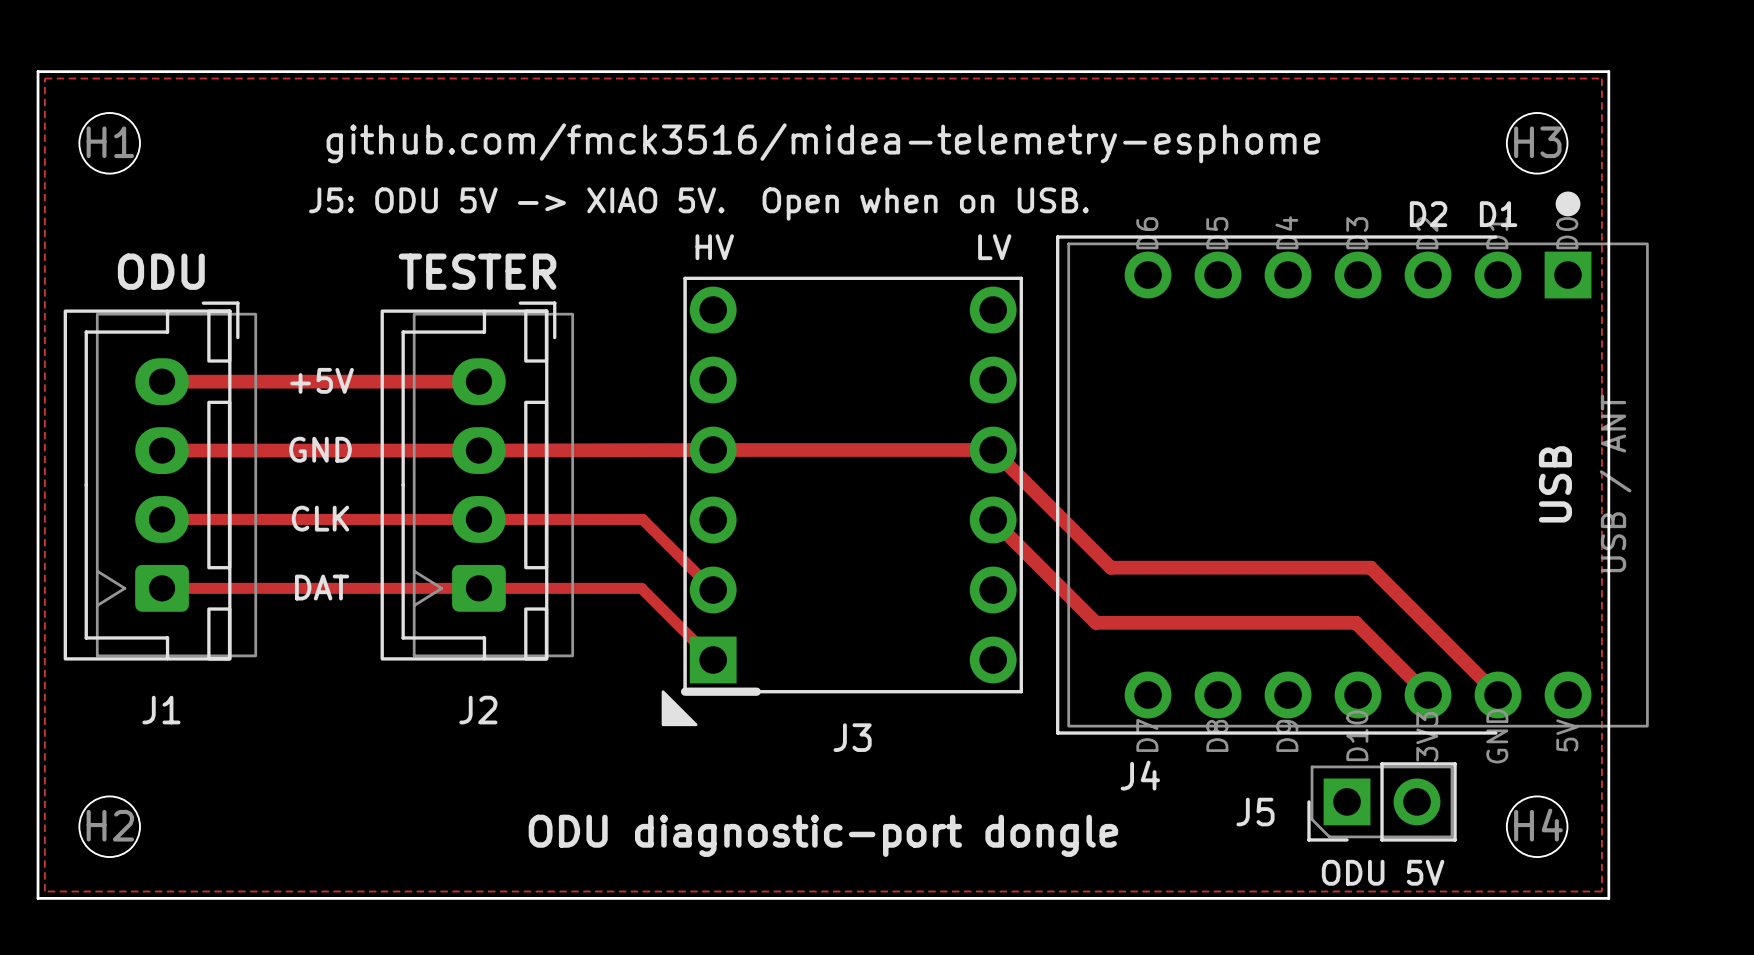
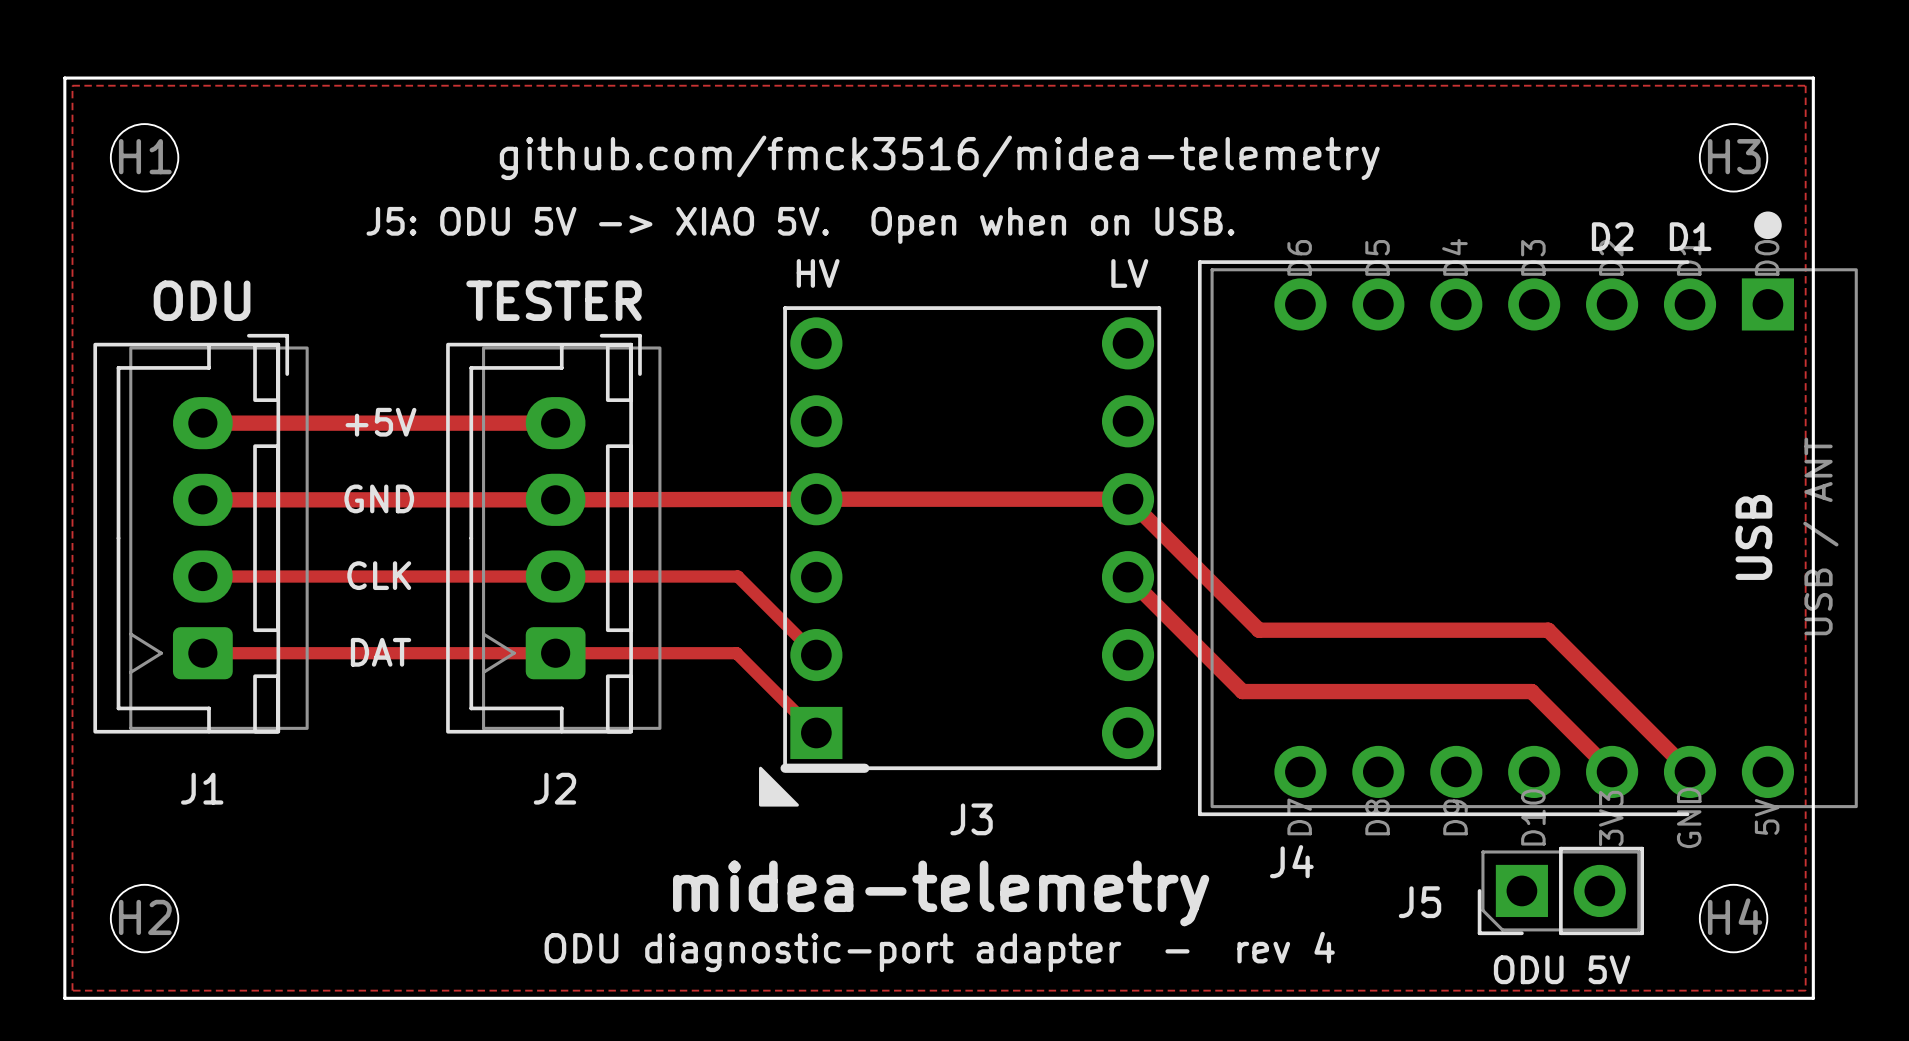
text: github.com/fmck3516/midea-telemetry-esphome (823, 143) -> github.com/fmck3516/midea-telemetry (939, 157)
text: none -> midea-telemetry (941, 893)
text: ODU diagnostic-port dongle (823, 835) -> ODU diagnostic-port adapter - rev 4 (939, 951)

